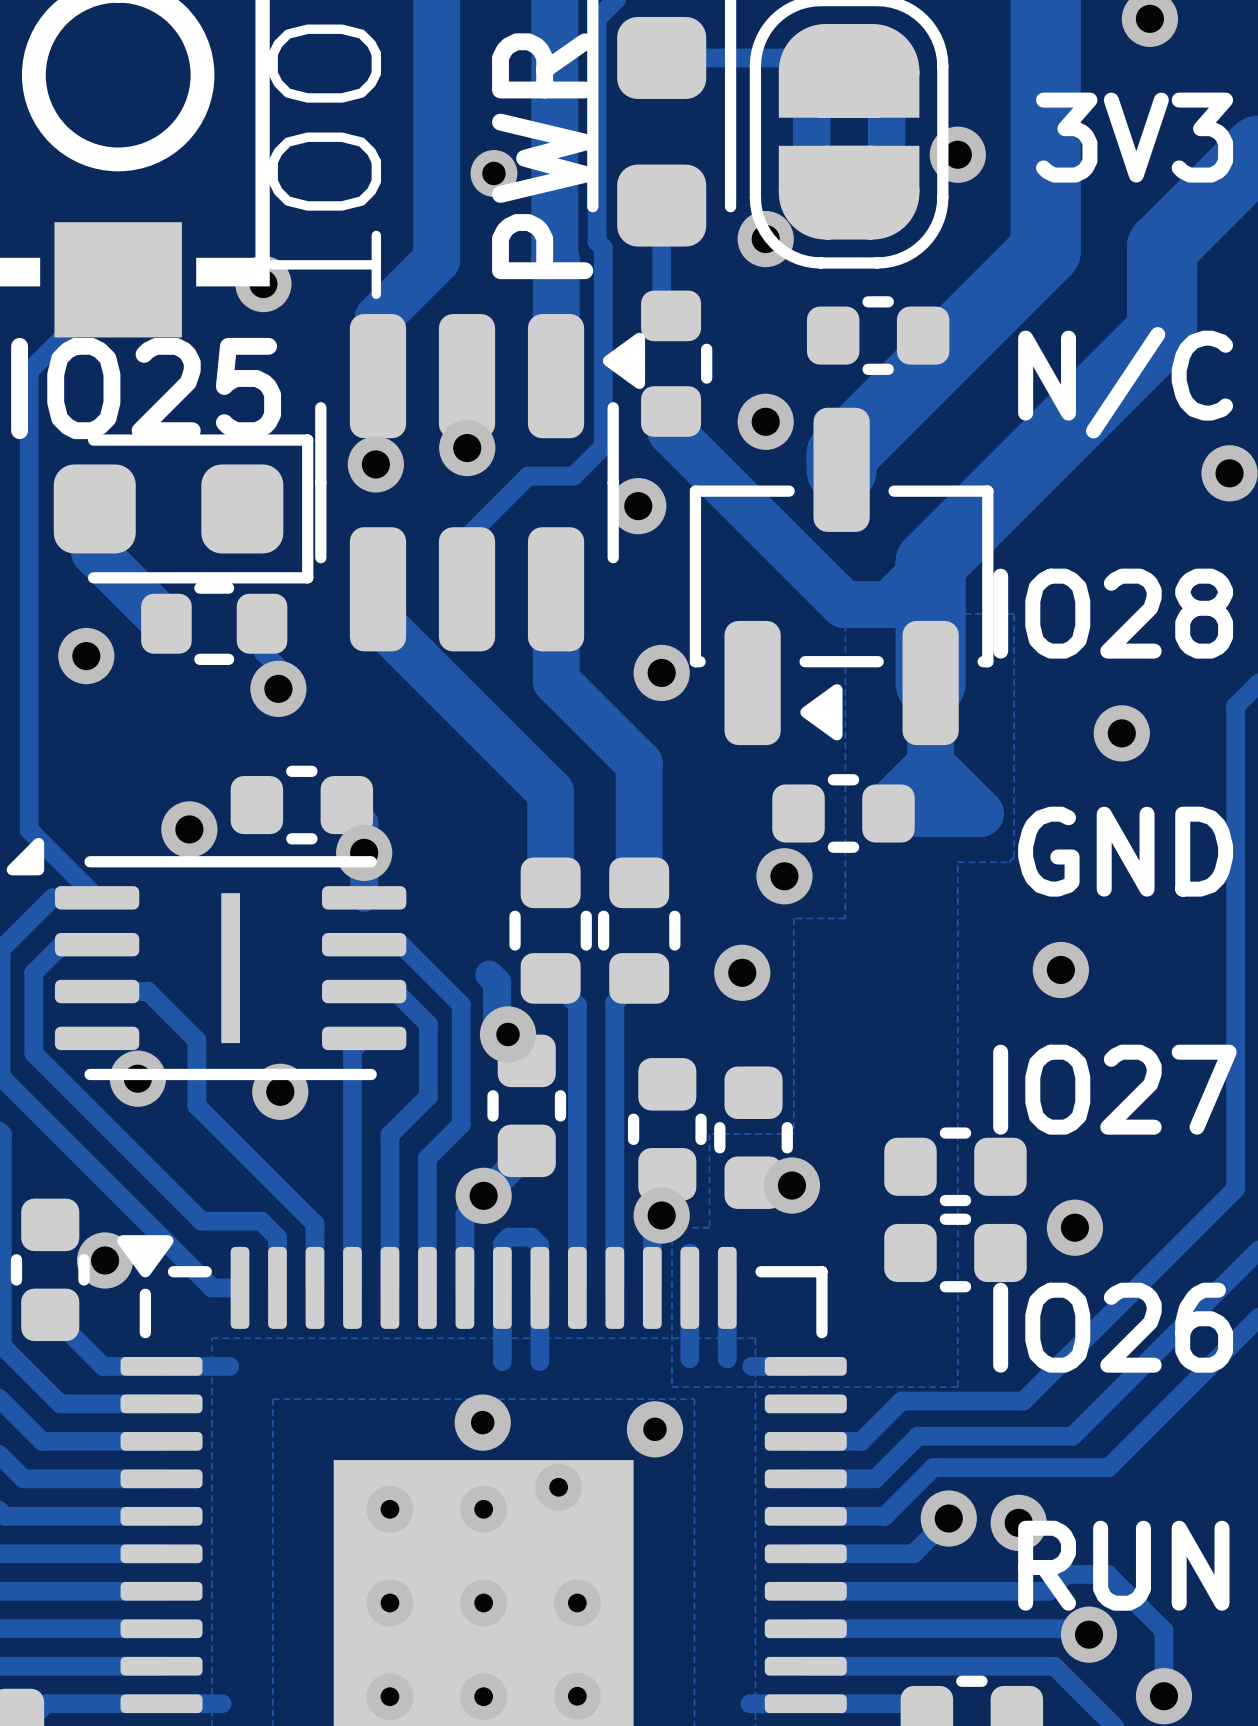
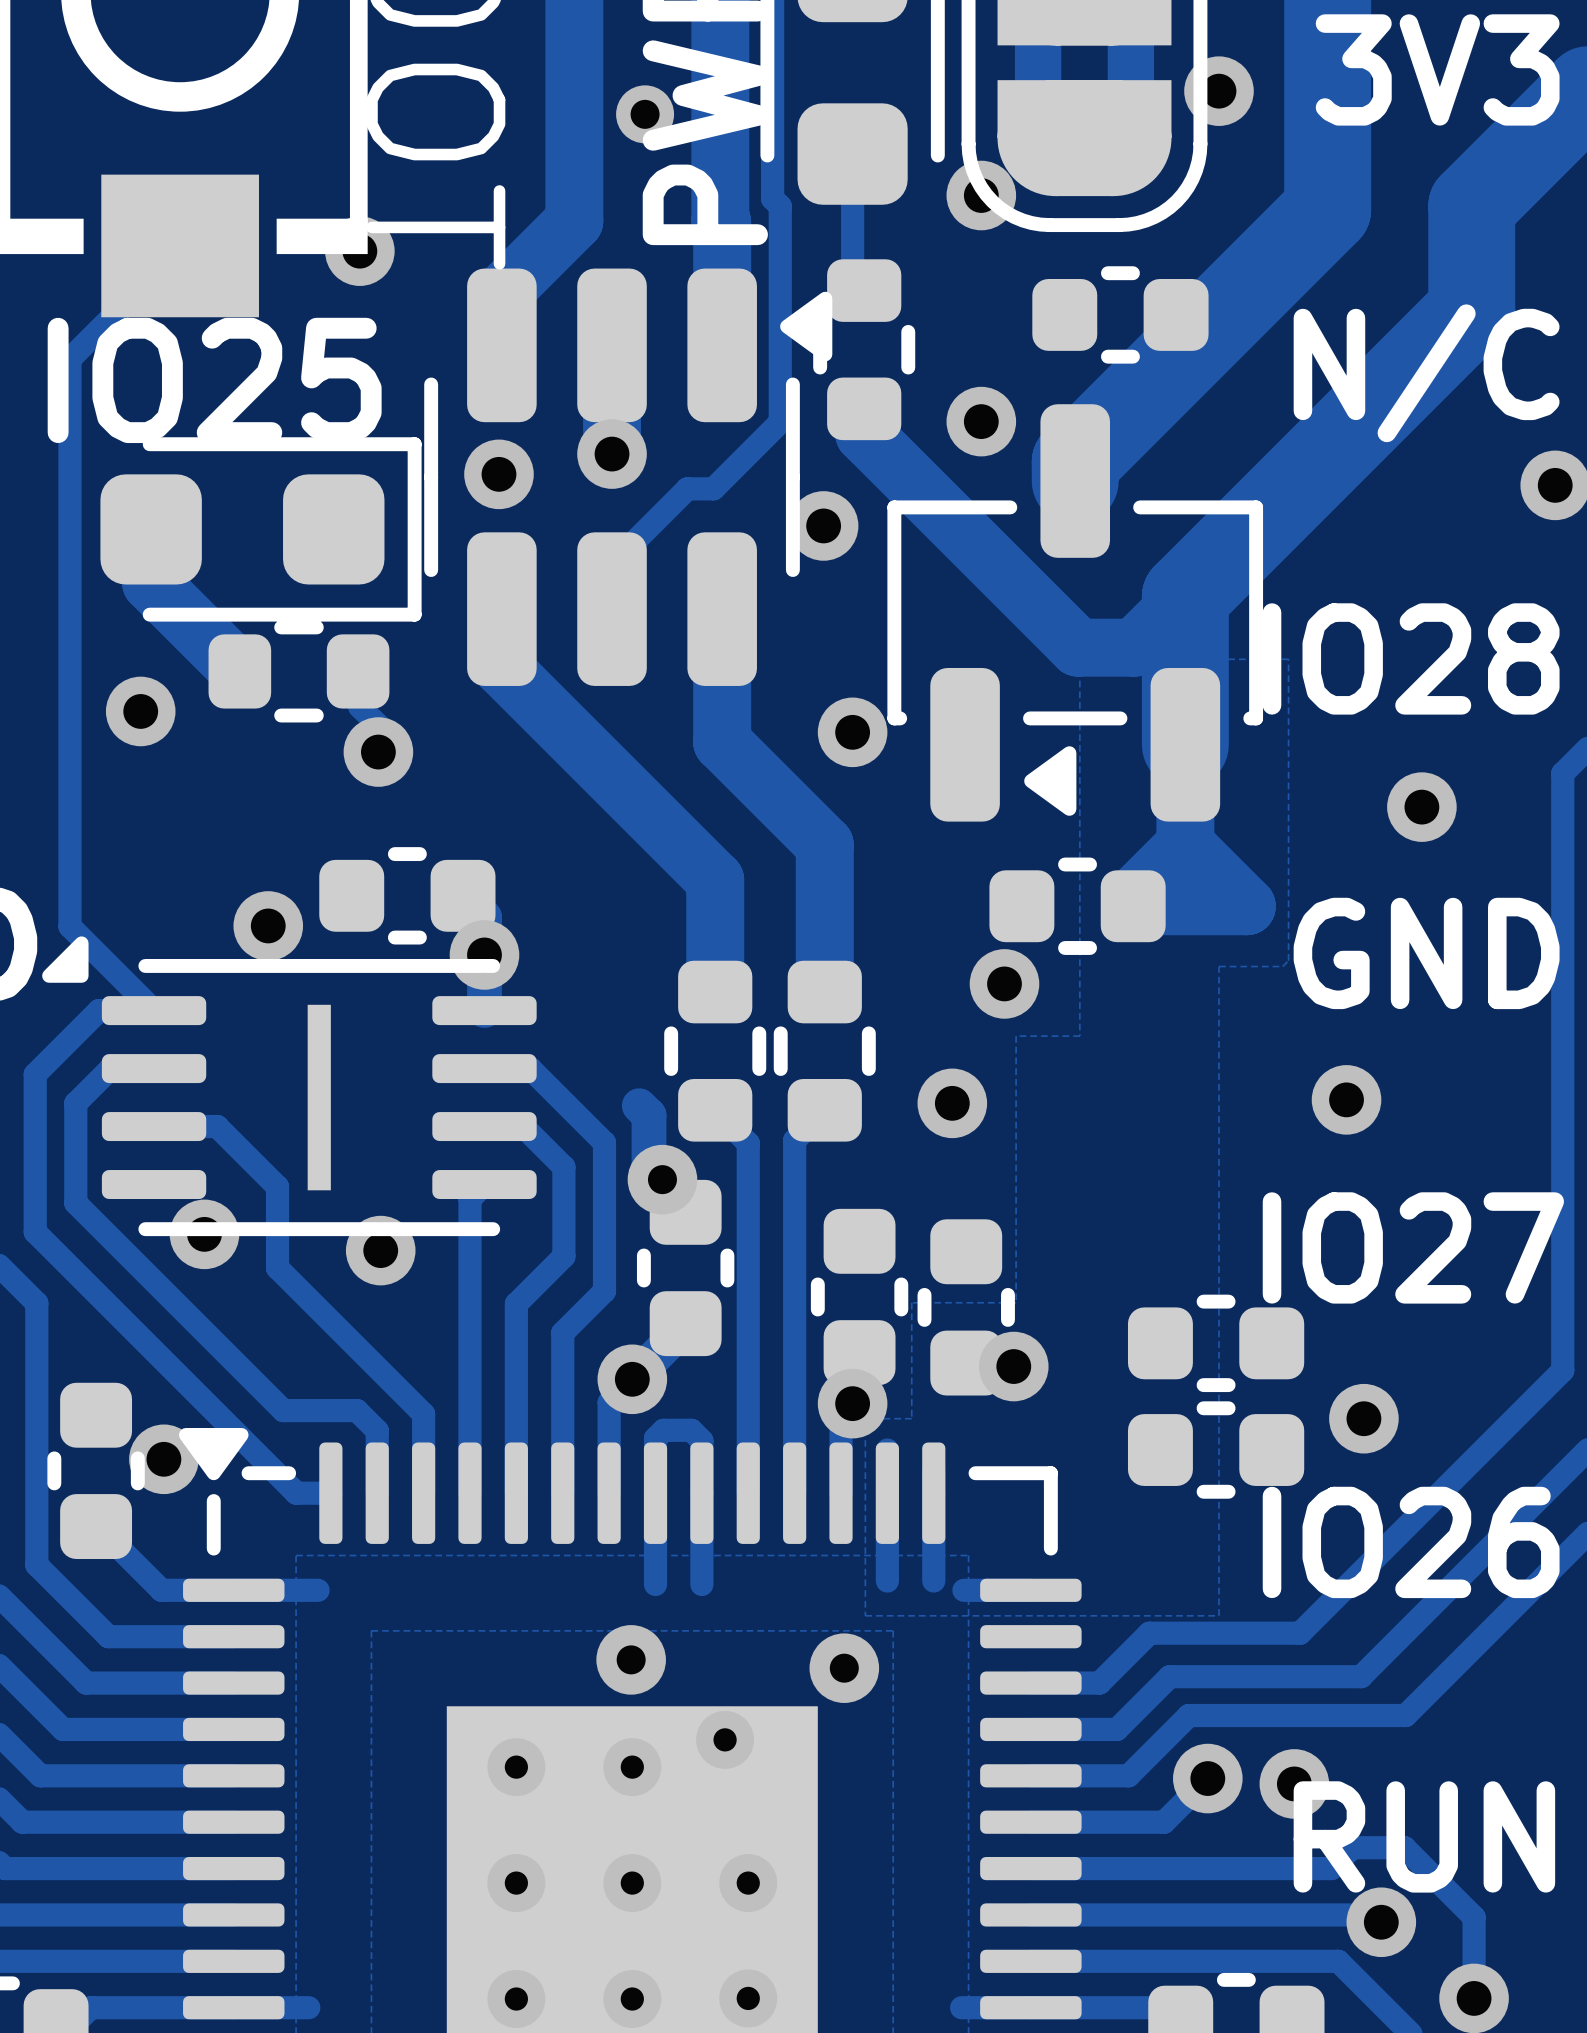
track: (603, 422) (603, 446) (573, 476) (549, 476) -> (780, 422) (713, 488)
part position: (480, 482) -> (628, 477)

